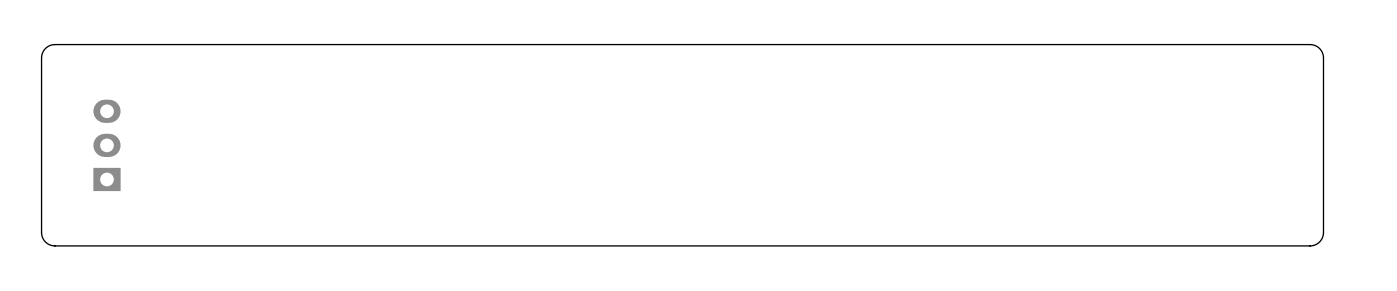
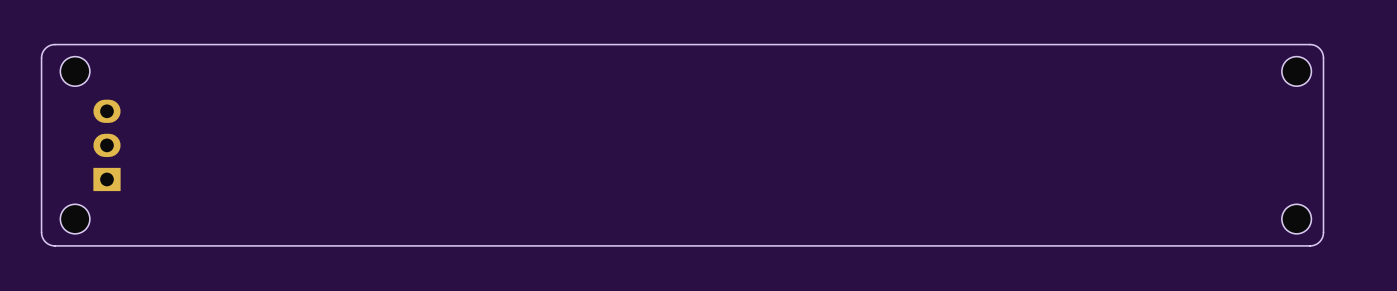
part: none -> (75, 71)
part: none -> (1296, 71)
part: none -> (75, 219)
part: none -> (1296, 219)

